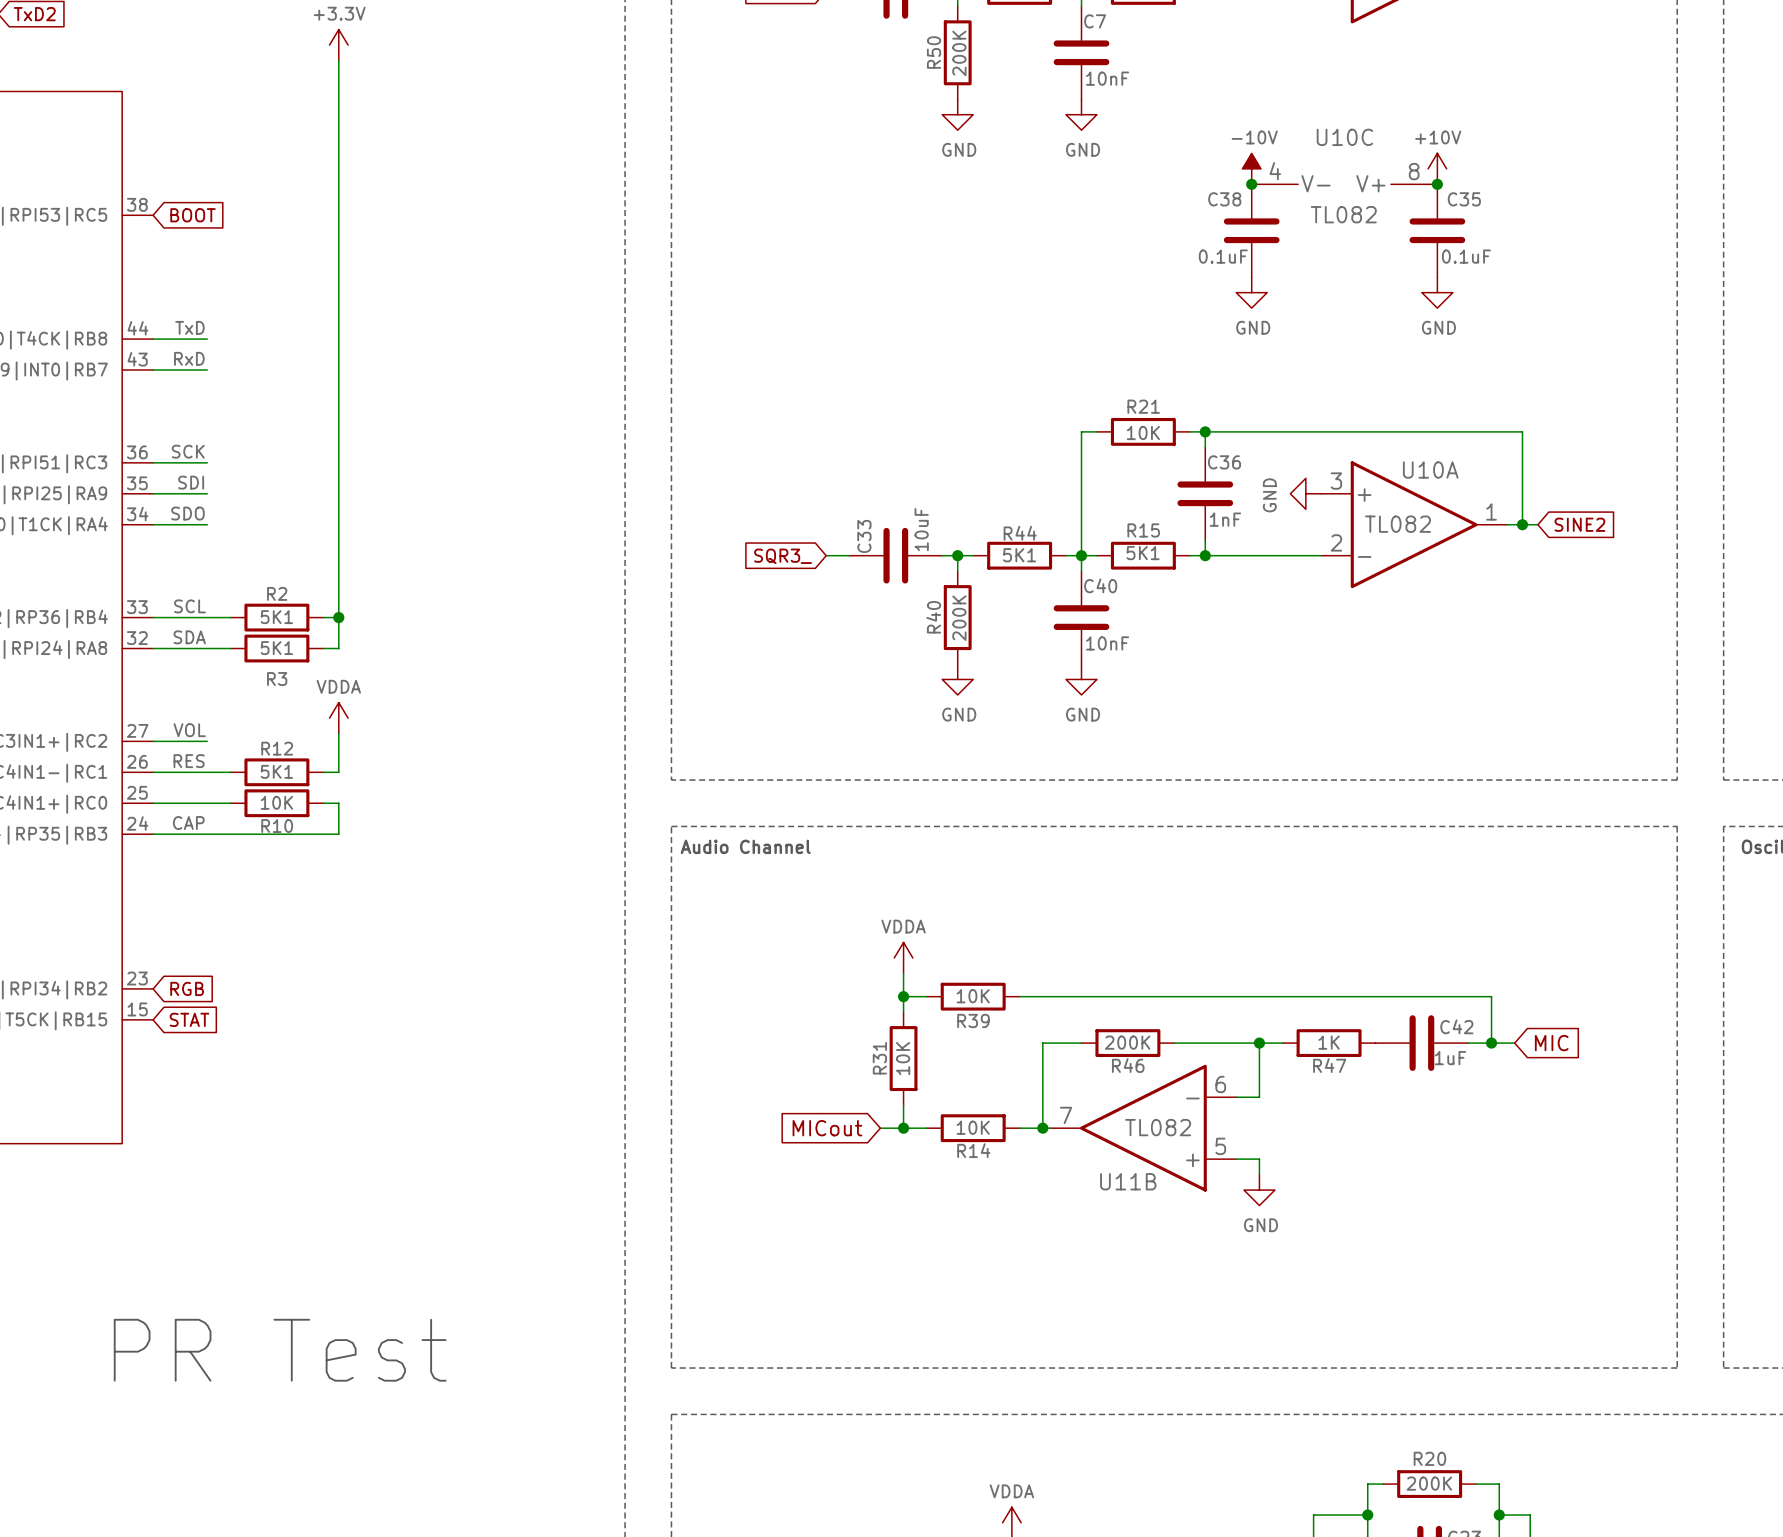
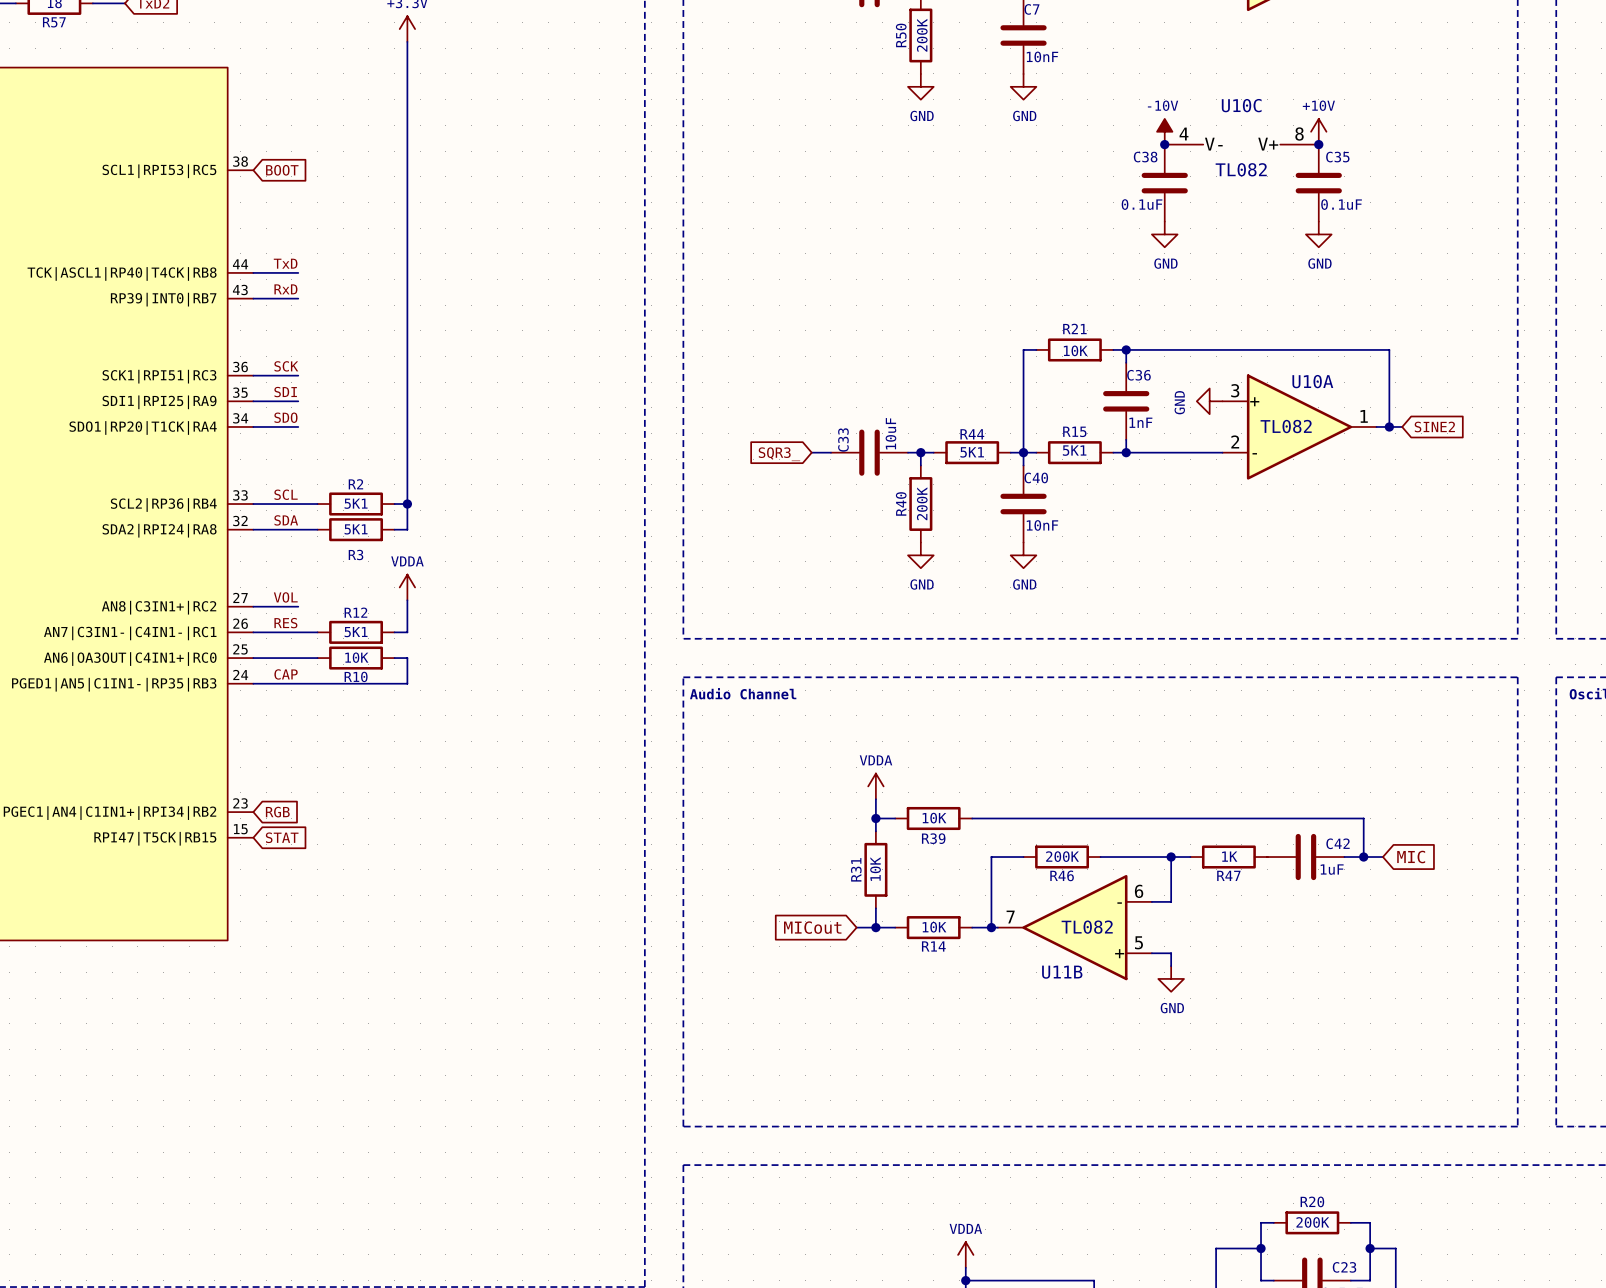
text: PR Test (280, 1350) -> none

